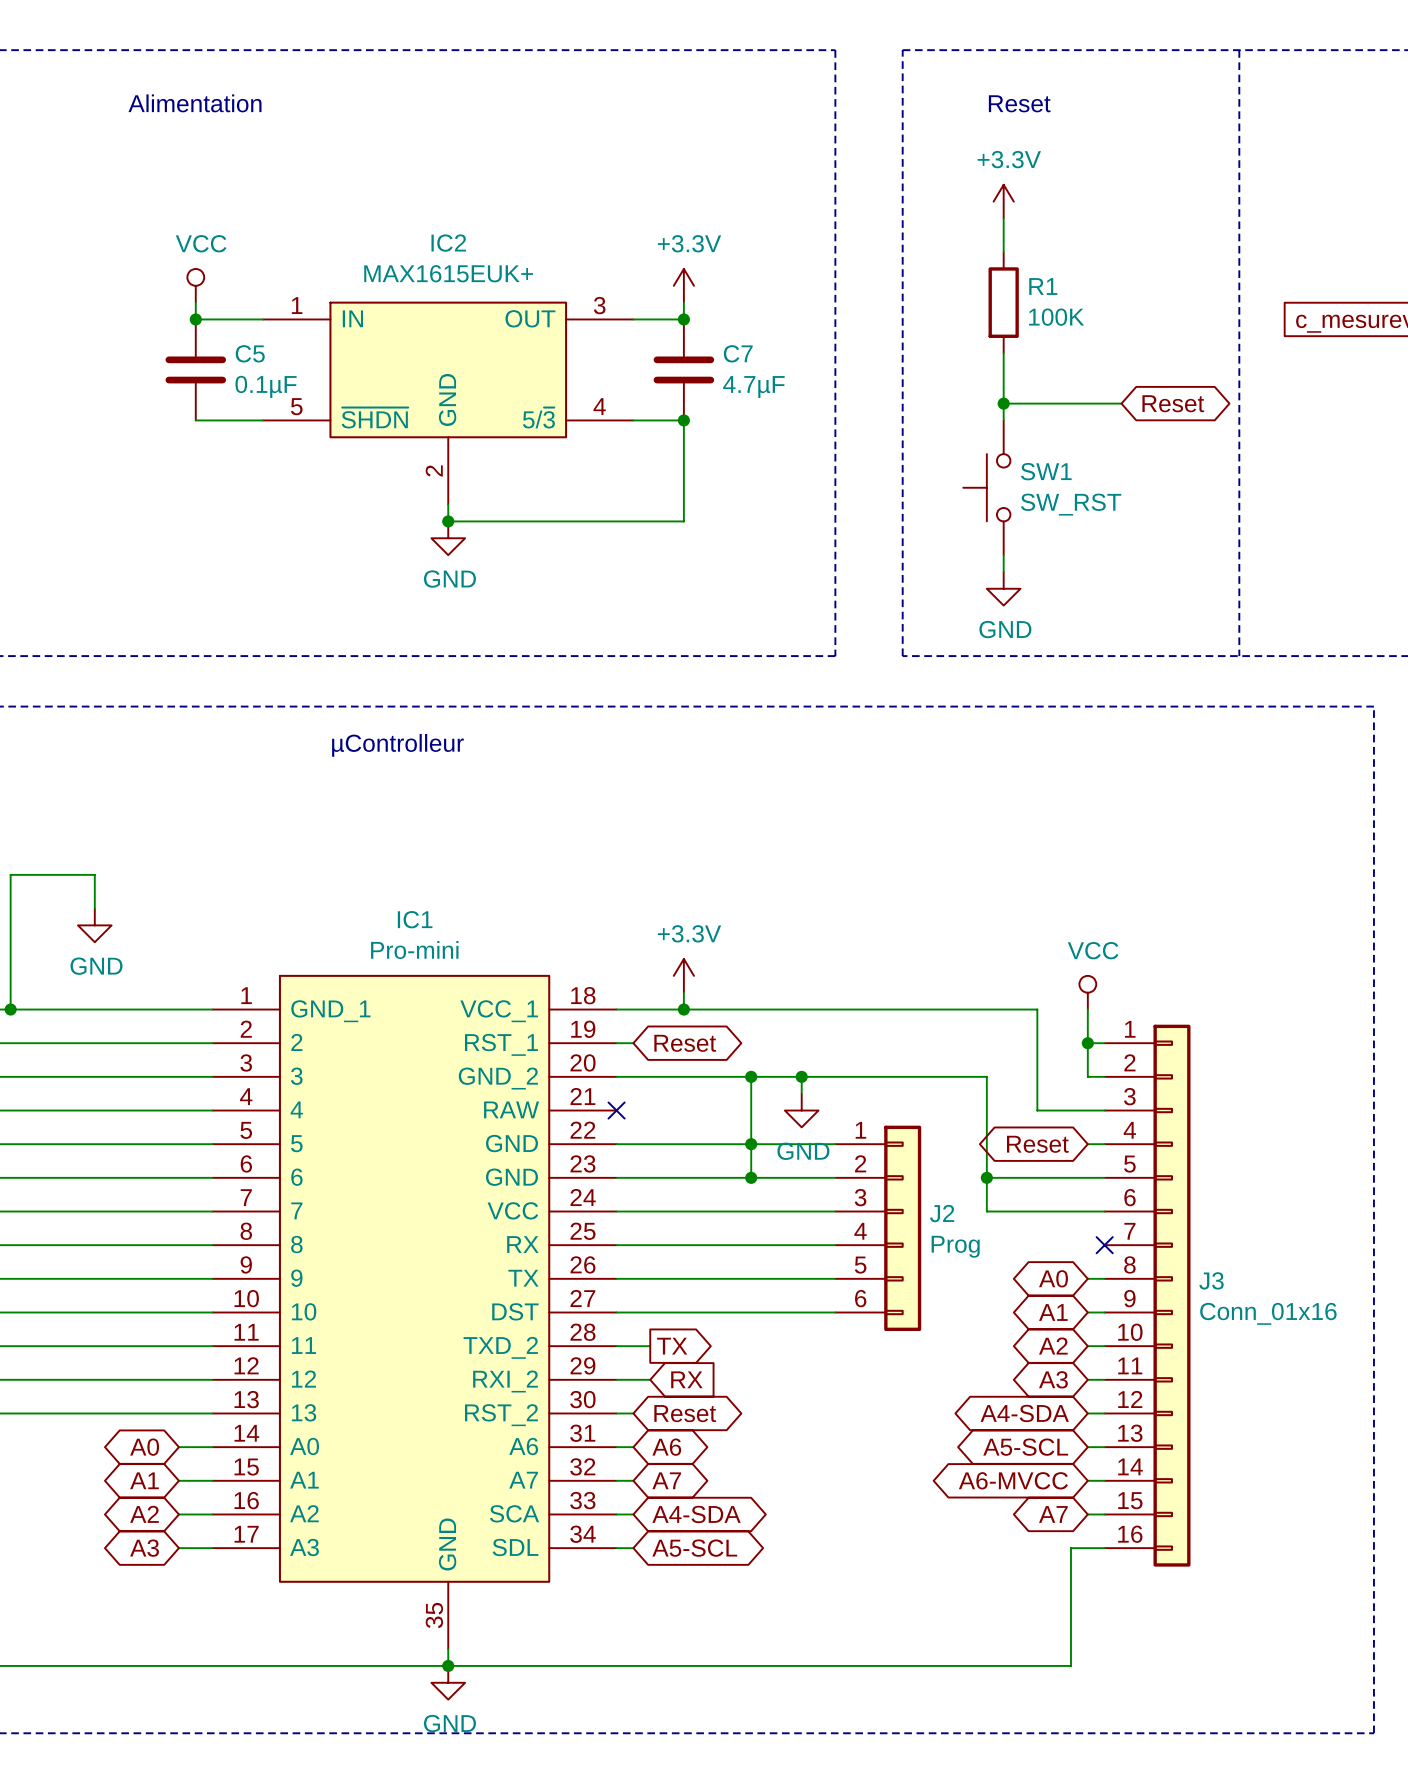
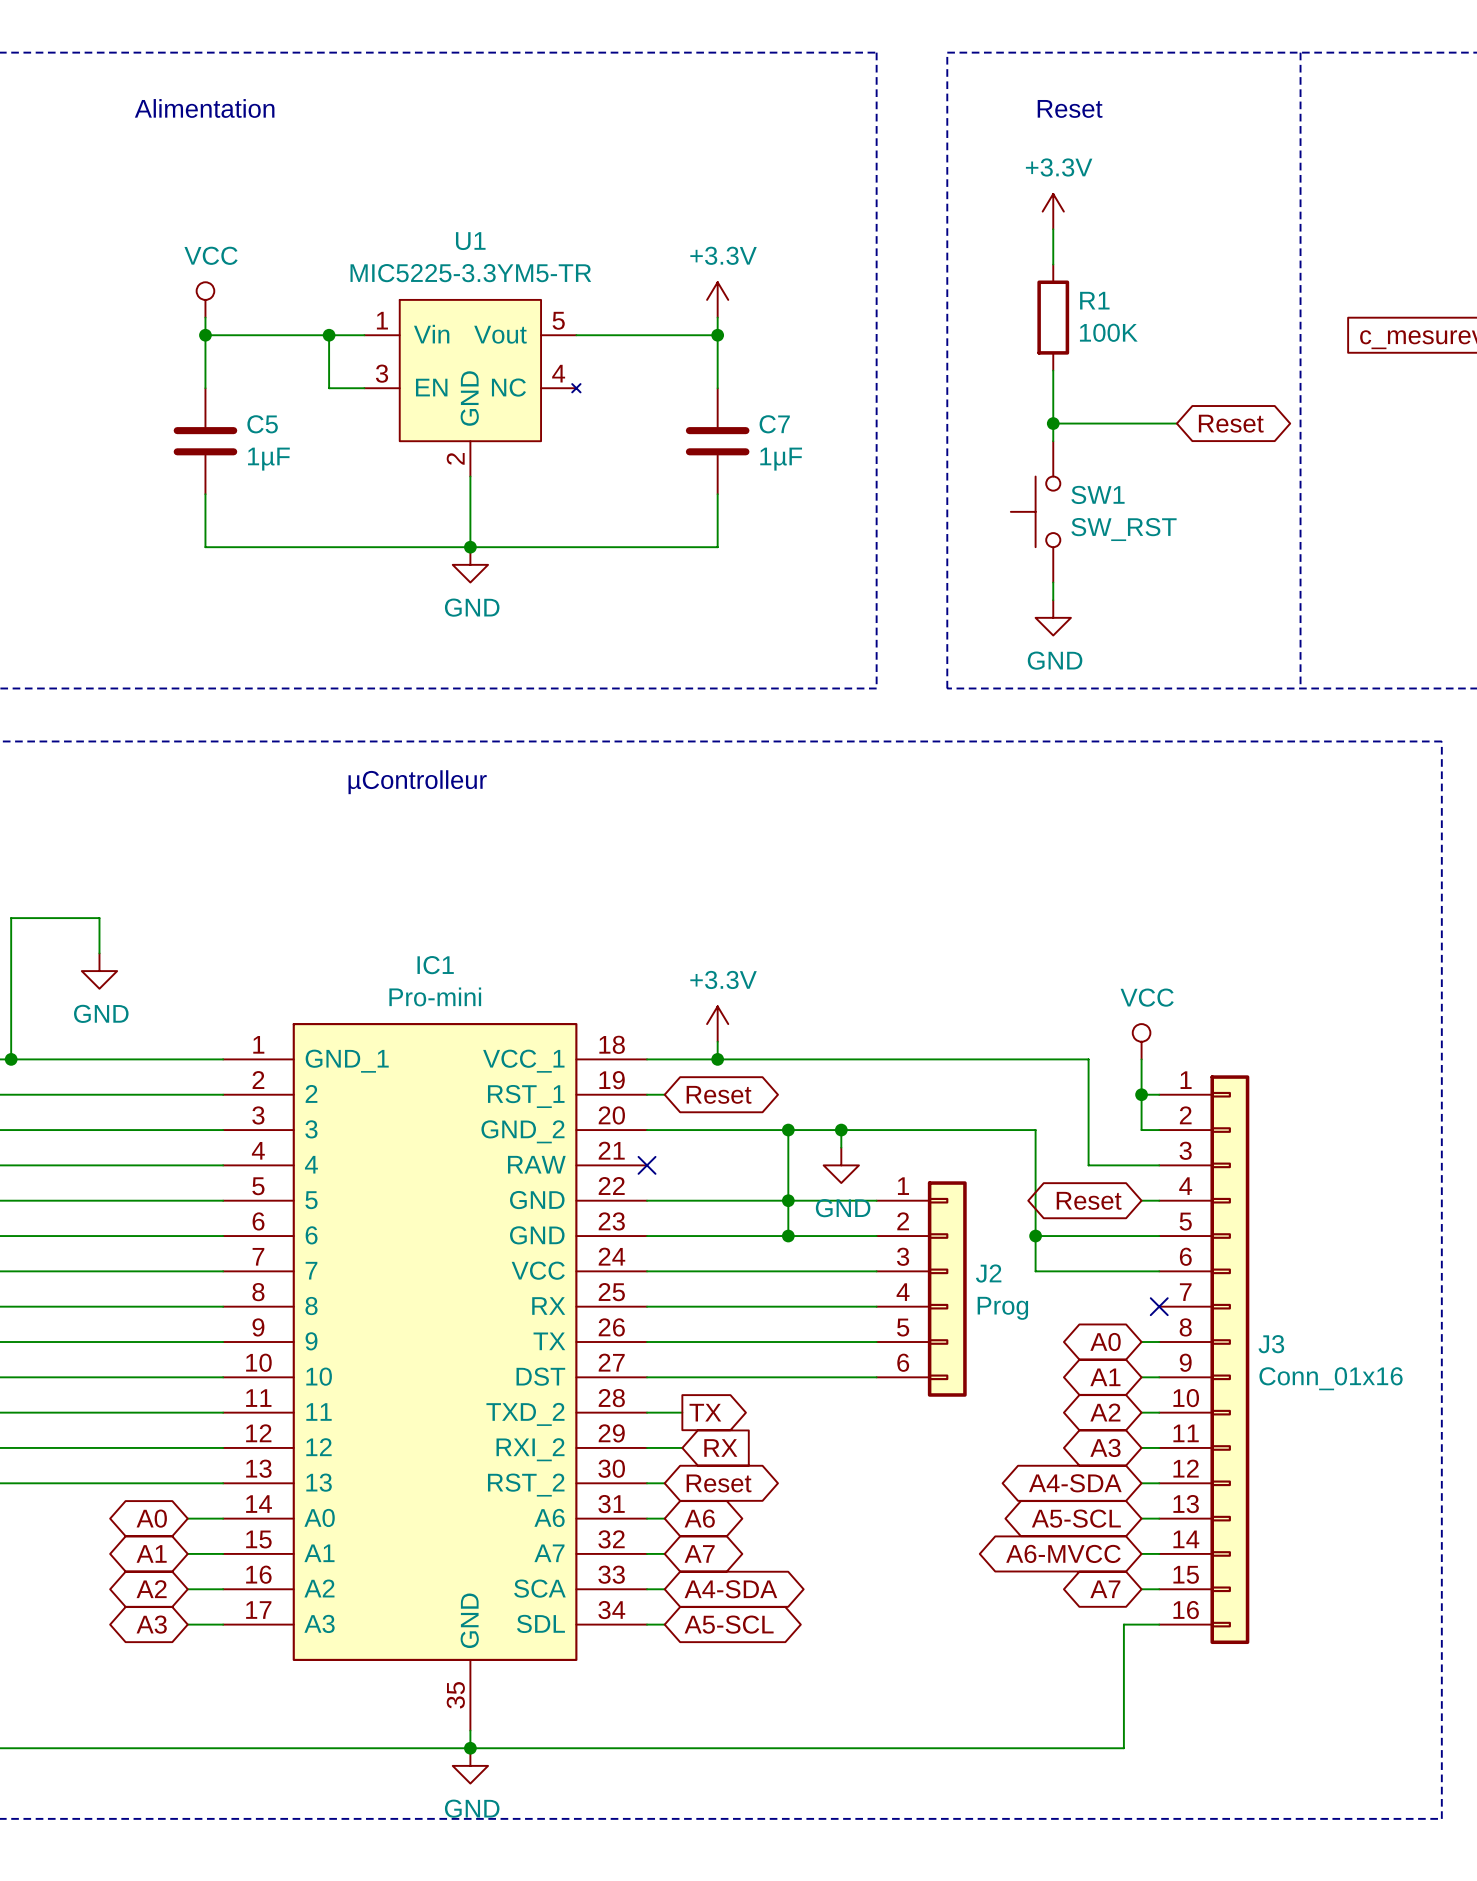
wire: none -> (329, 335) (329, 388) (364, 388)
junction: none -> (329, 335)
C5 position: (195, 369) -> (205, 441)
U1: none -> MIC5225-3.3YM5-TR (472, 388)
C7 position: (683, 369) -> (717, 441)
C5 value: 0.1µF (266, 386) -> 1µF (268, 459)
C7 value: 4.7µF (753, 387) -> 1µF (781, 459)
IC2: MAX1615EUK+ (448, 403) -> none
wire: (195, 420) (263, 420) -> none
wire: (633, 420) (683, 420) (683, 470) -> none
junction: (683, 420) -> none
wire: none -> (205, 494) (205, 547) (470, 547)

